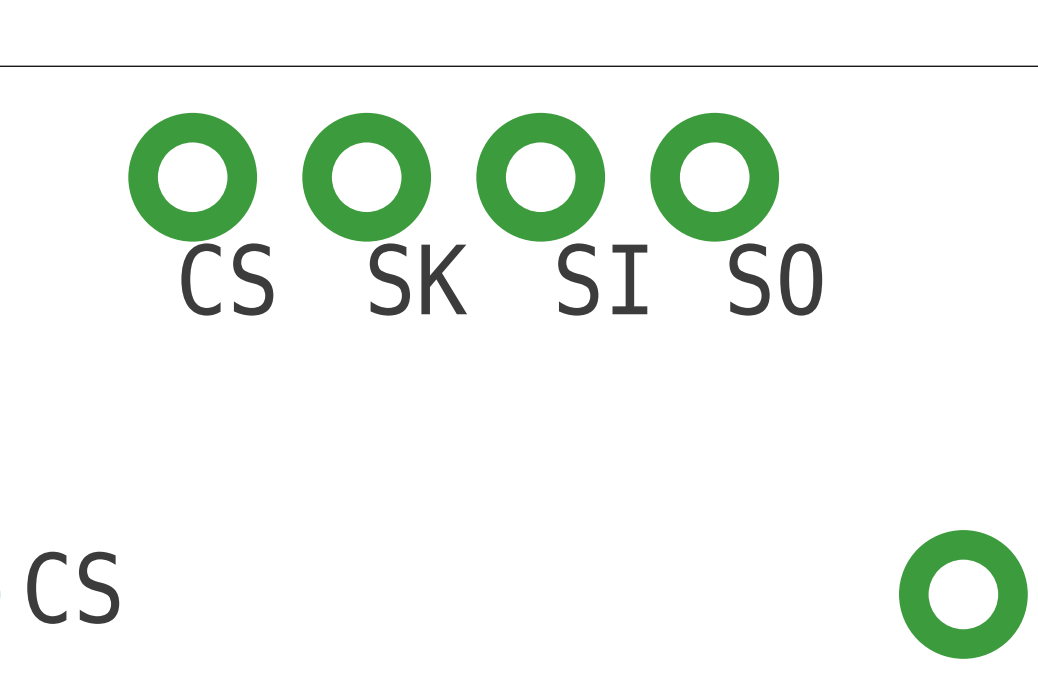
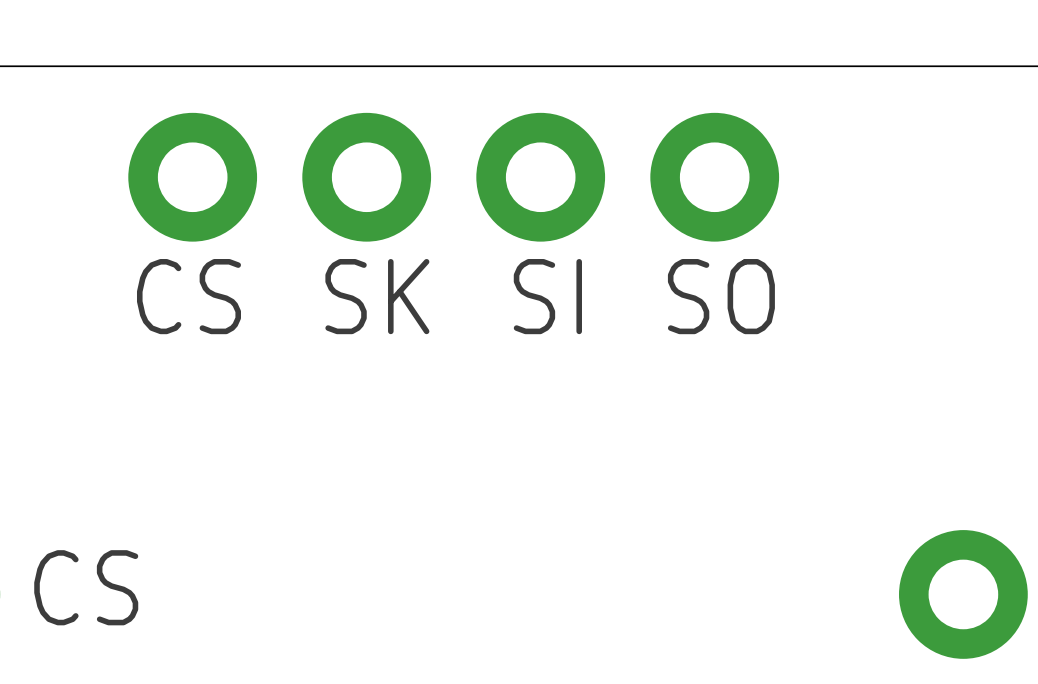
text position: CS (227, 279) -> CS (188, 296)
text position: SK (418, 279) -> SK (377, 296)
text position: SI (602, 279) -> SI (547, 296)
text position: SO (775, 279) -> SO (721, 296)

